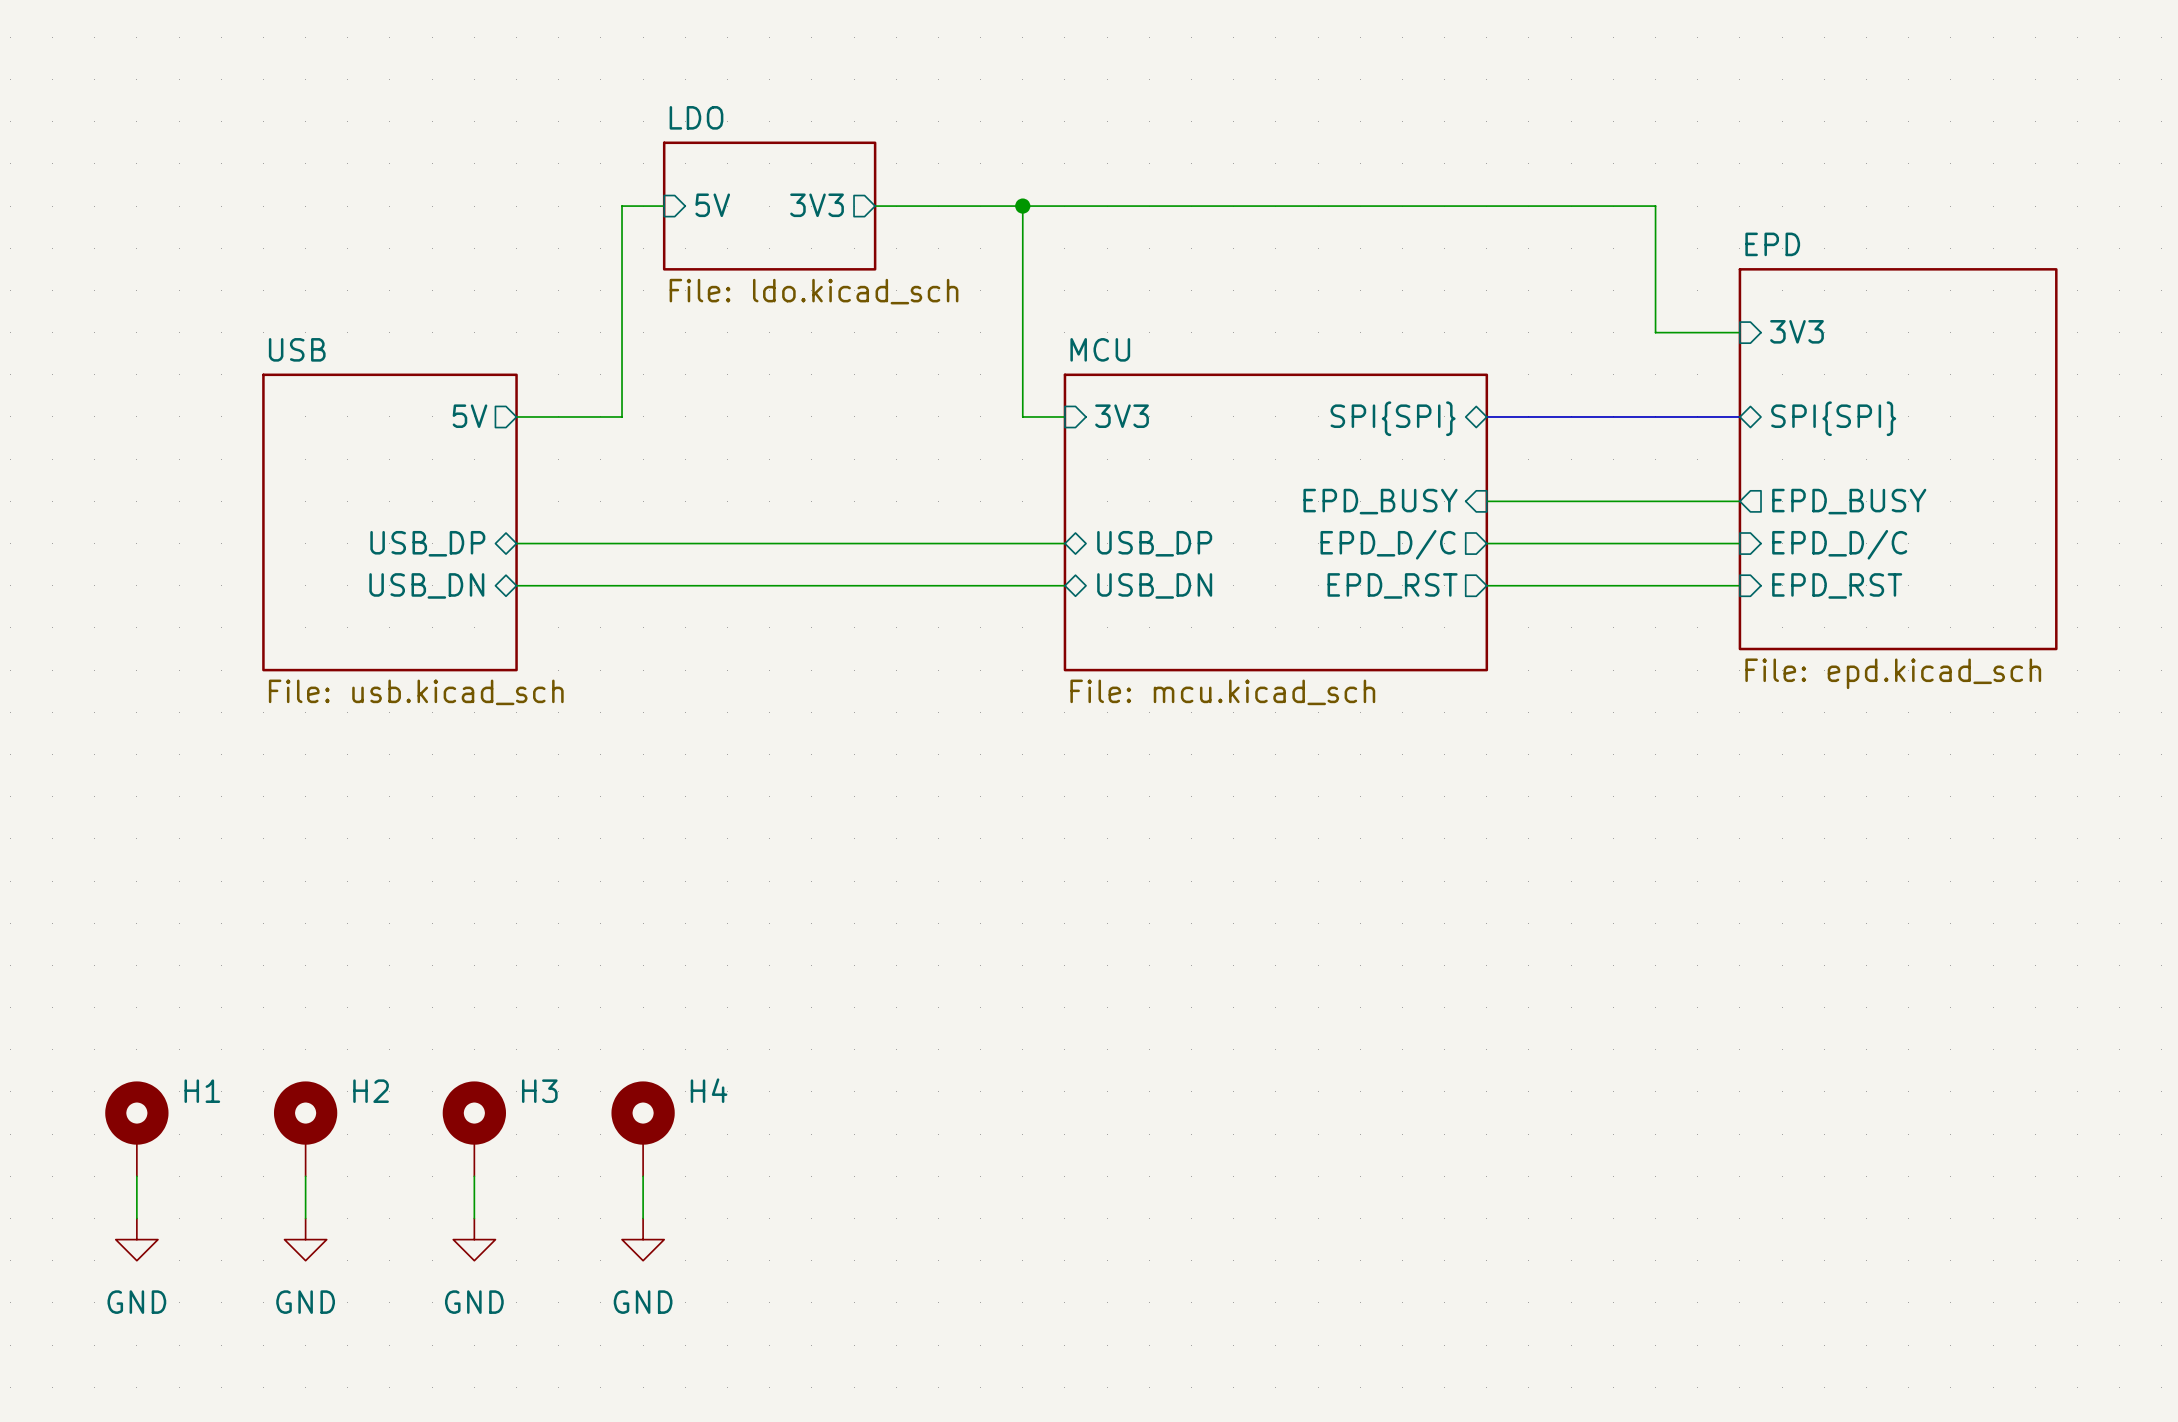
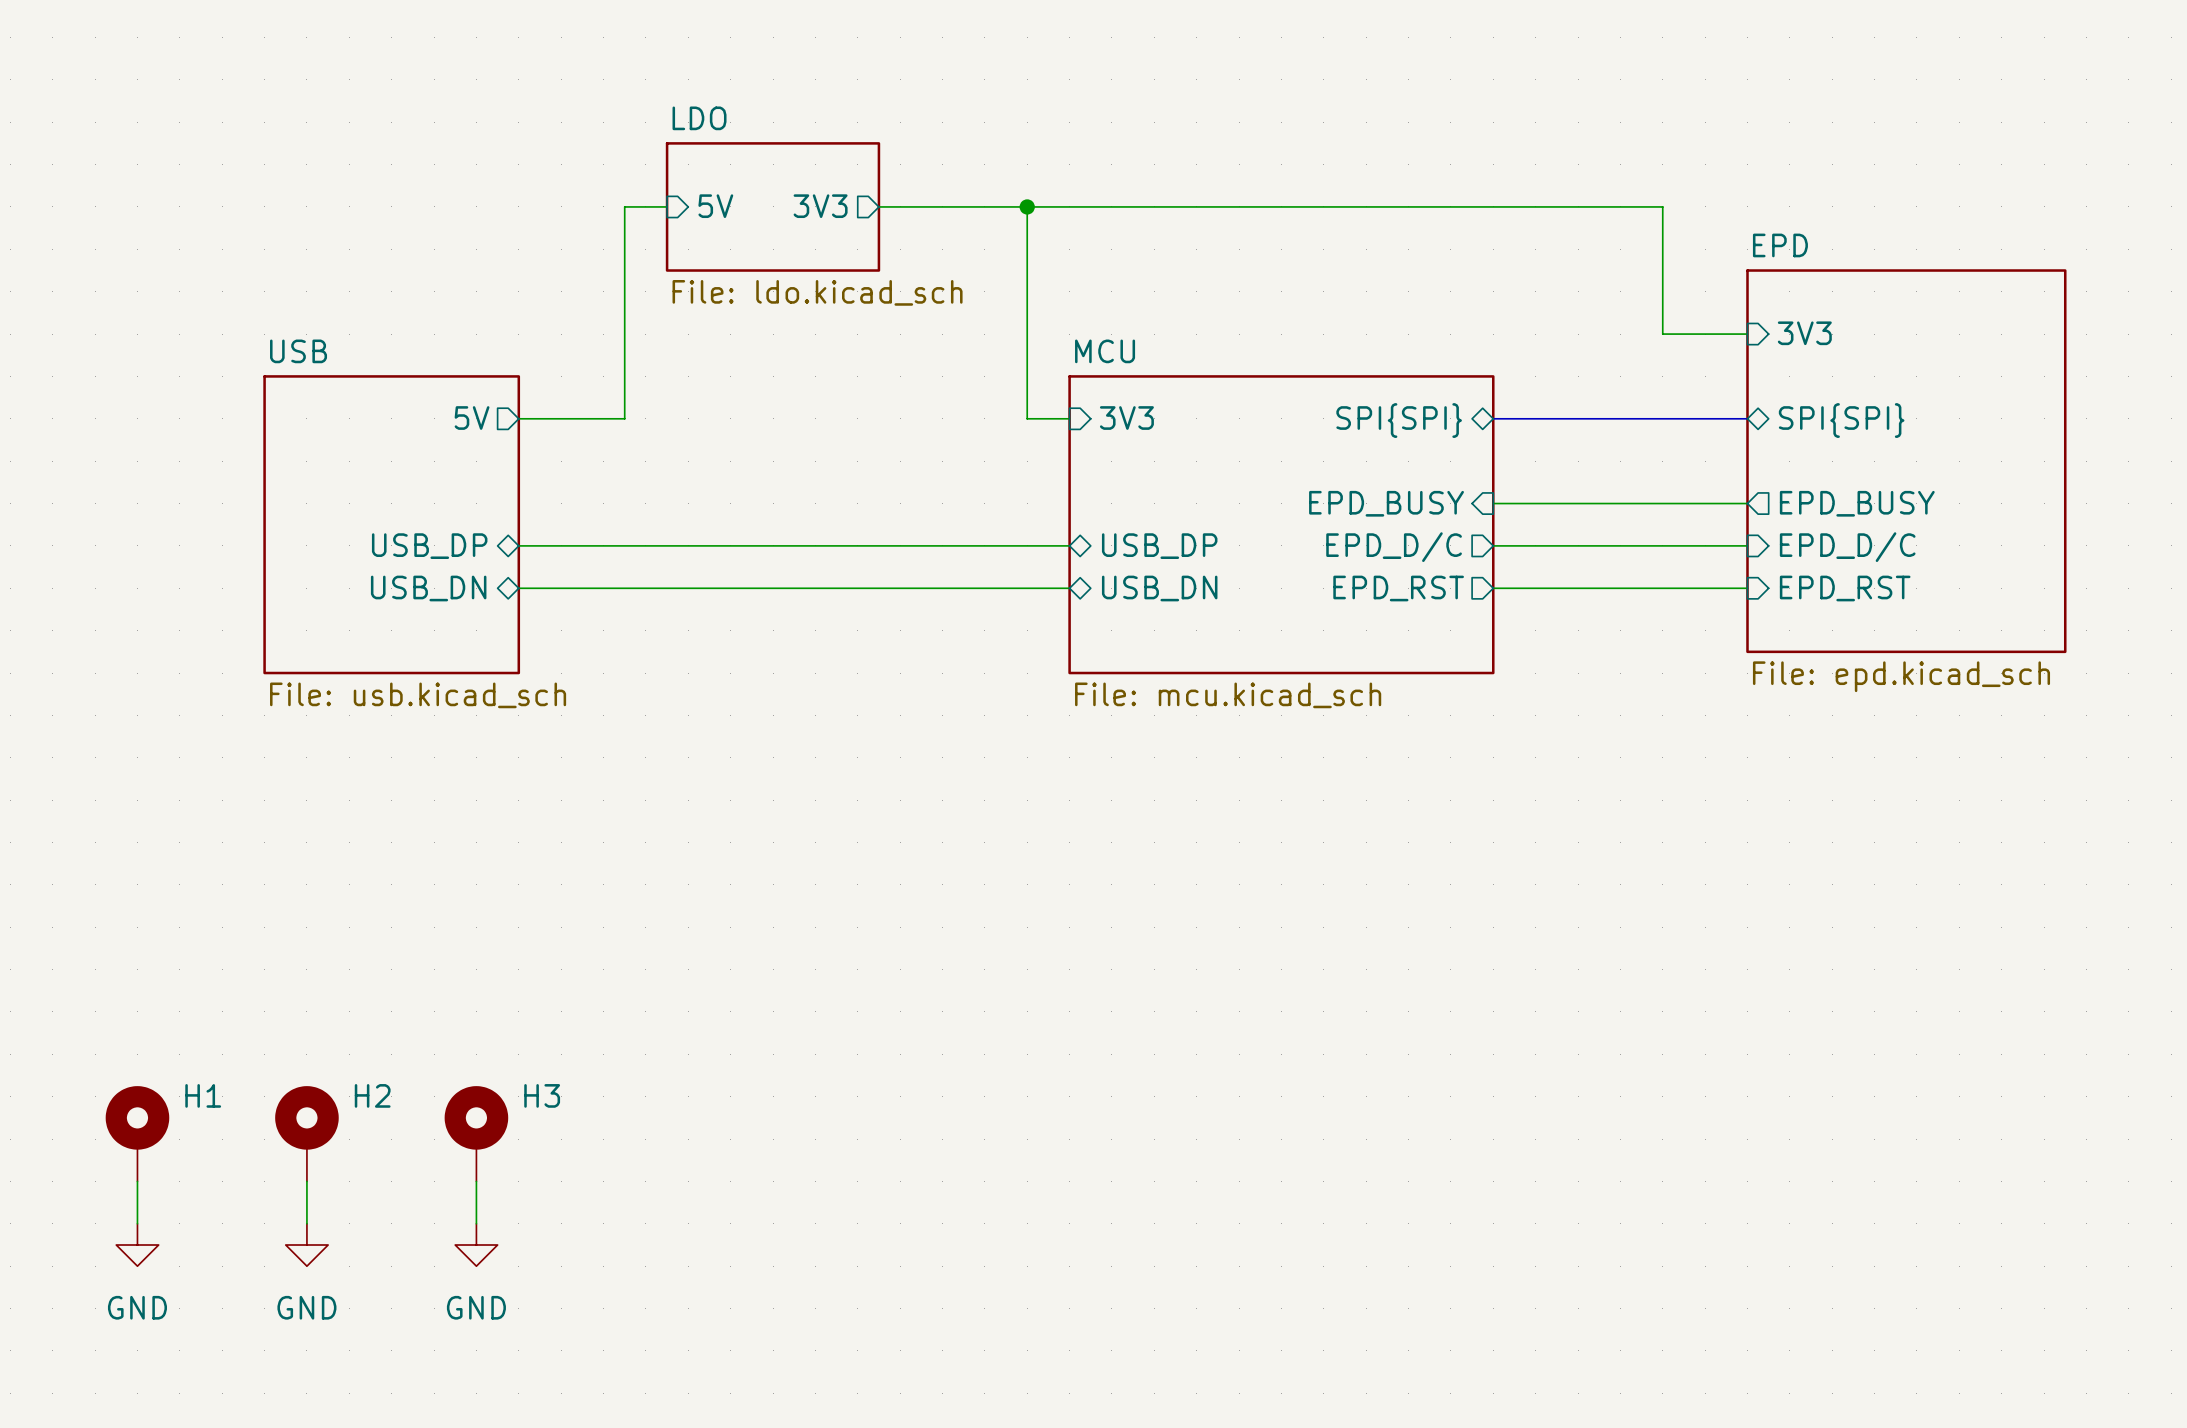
H4: (643, 1128) -> none
wire: (643, 1176) (643, 1218) -> none
power symbol: GND (643, 1239) -> none

